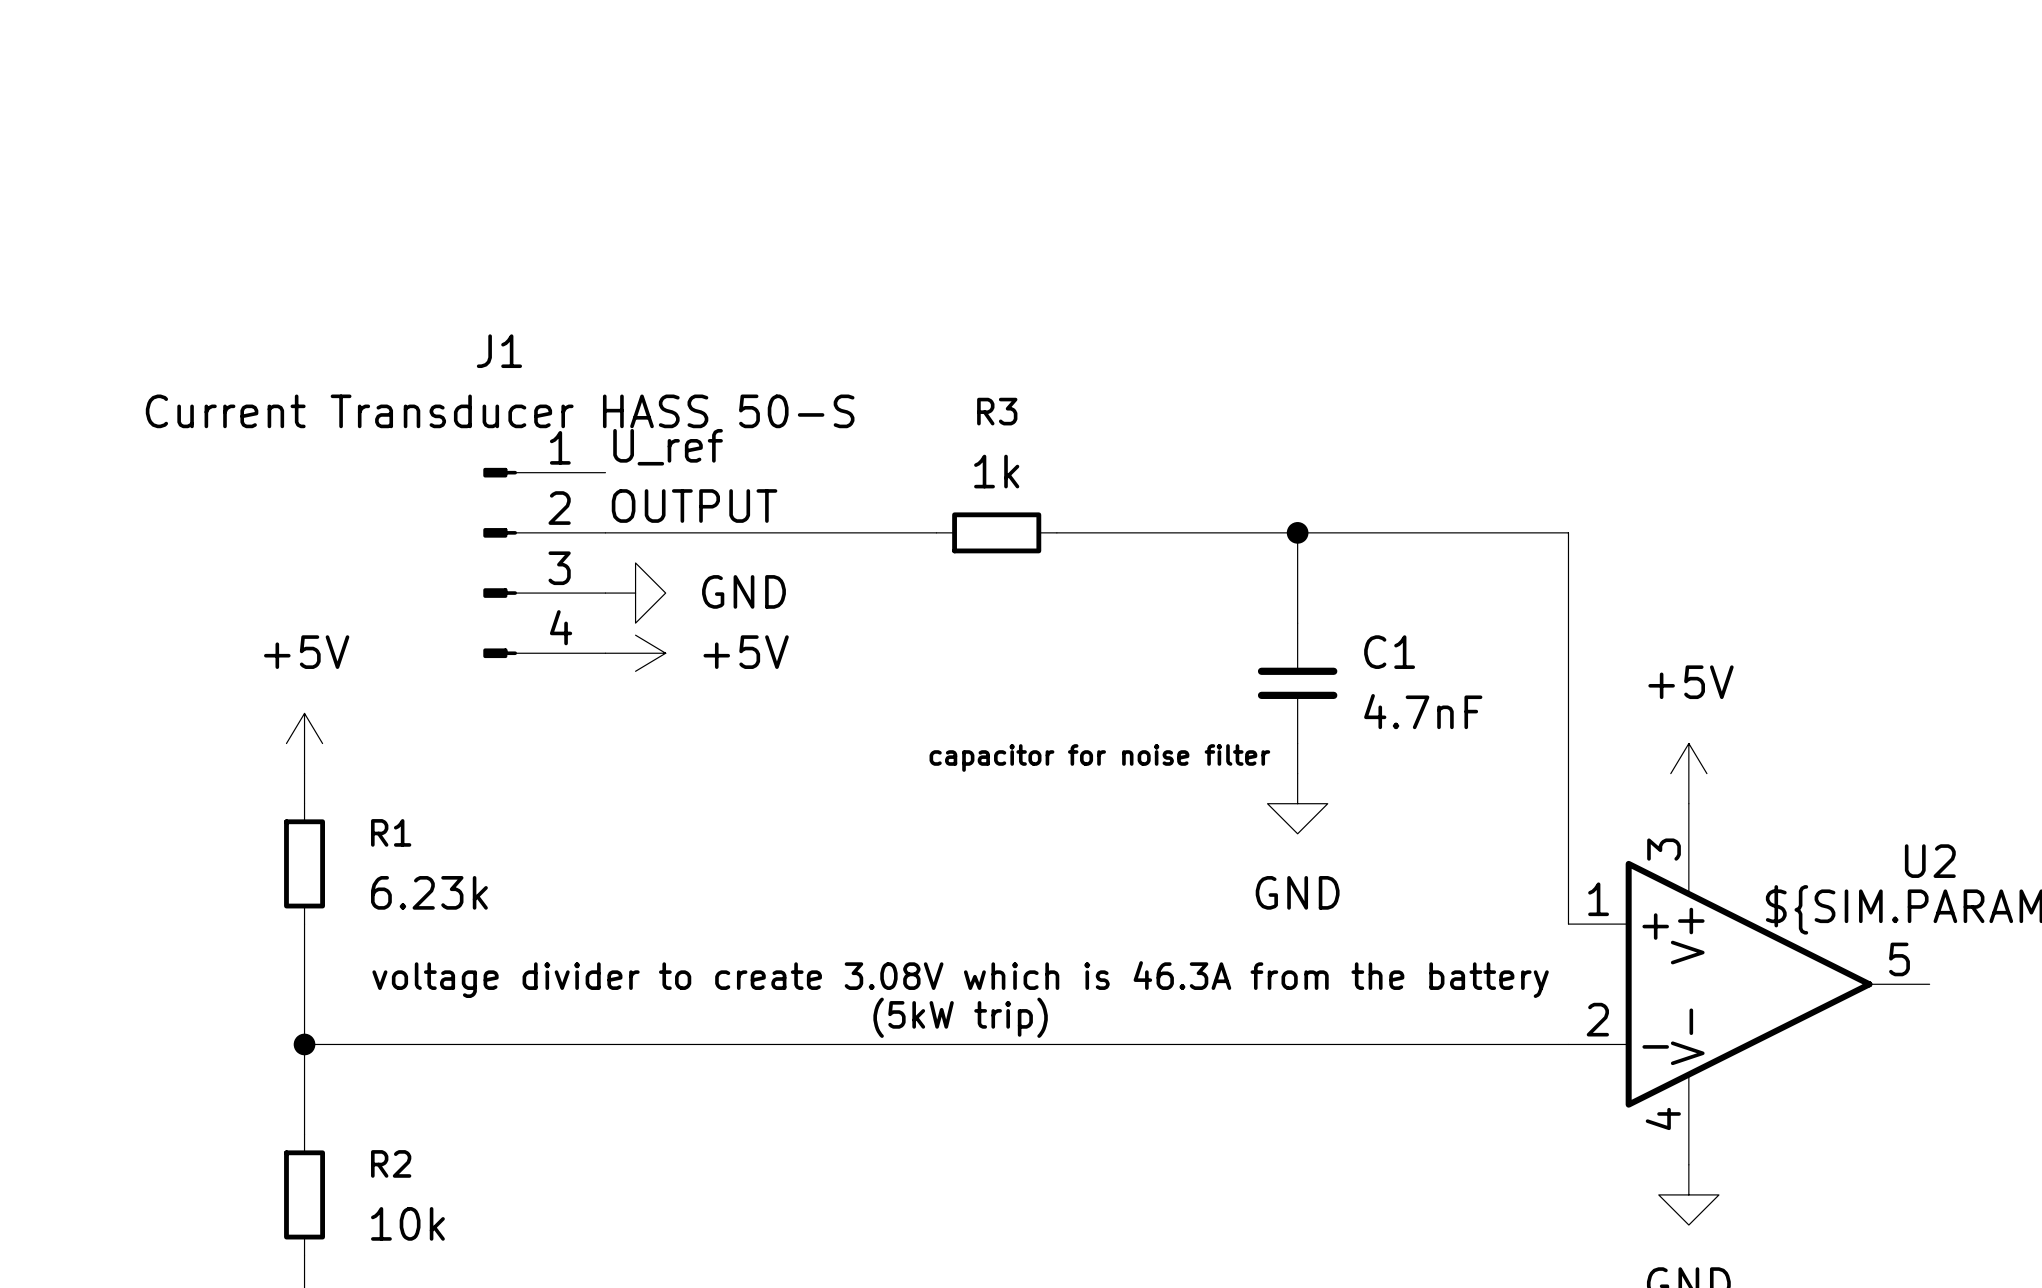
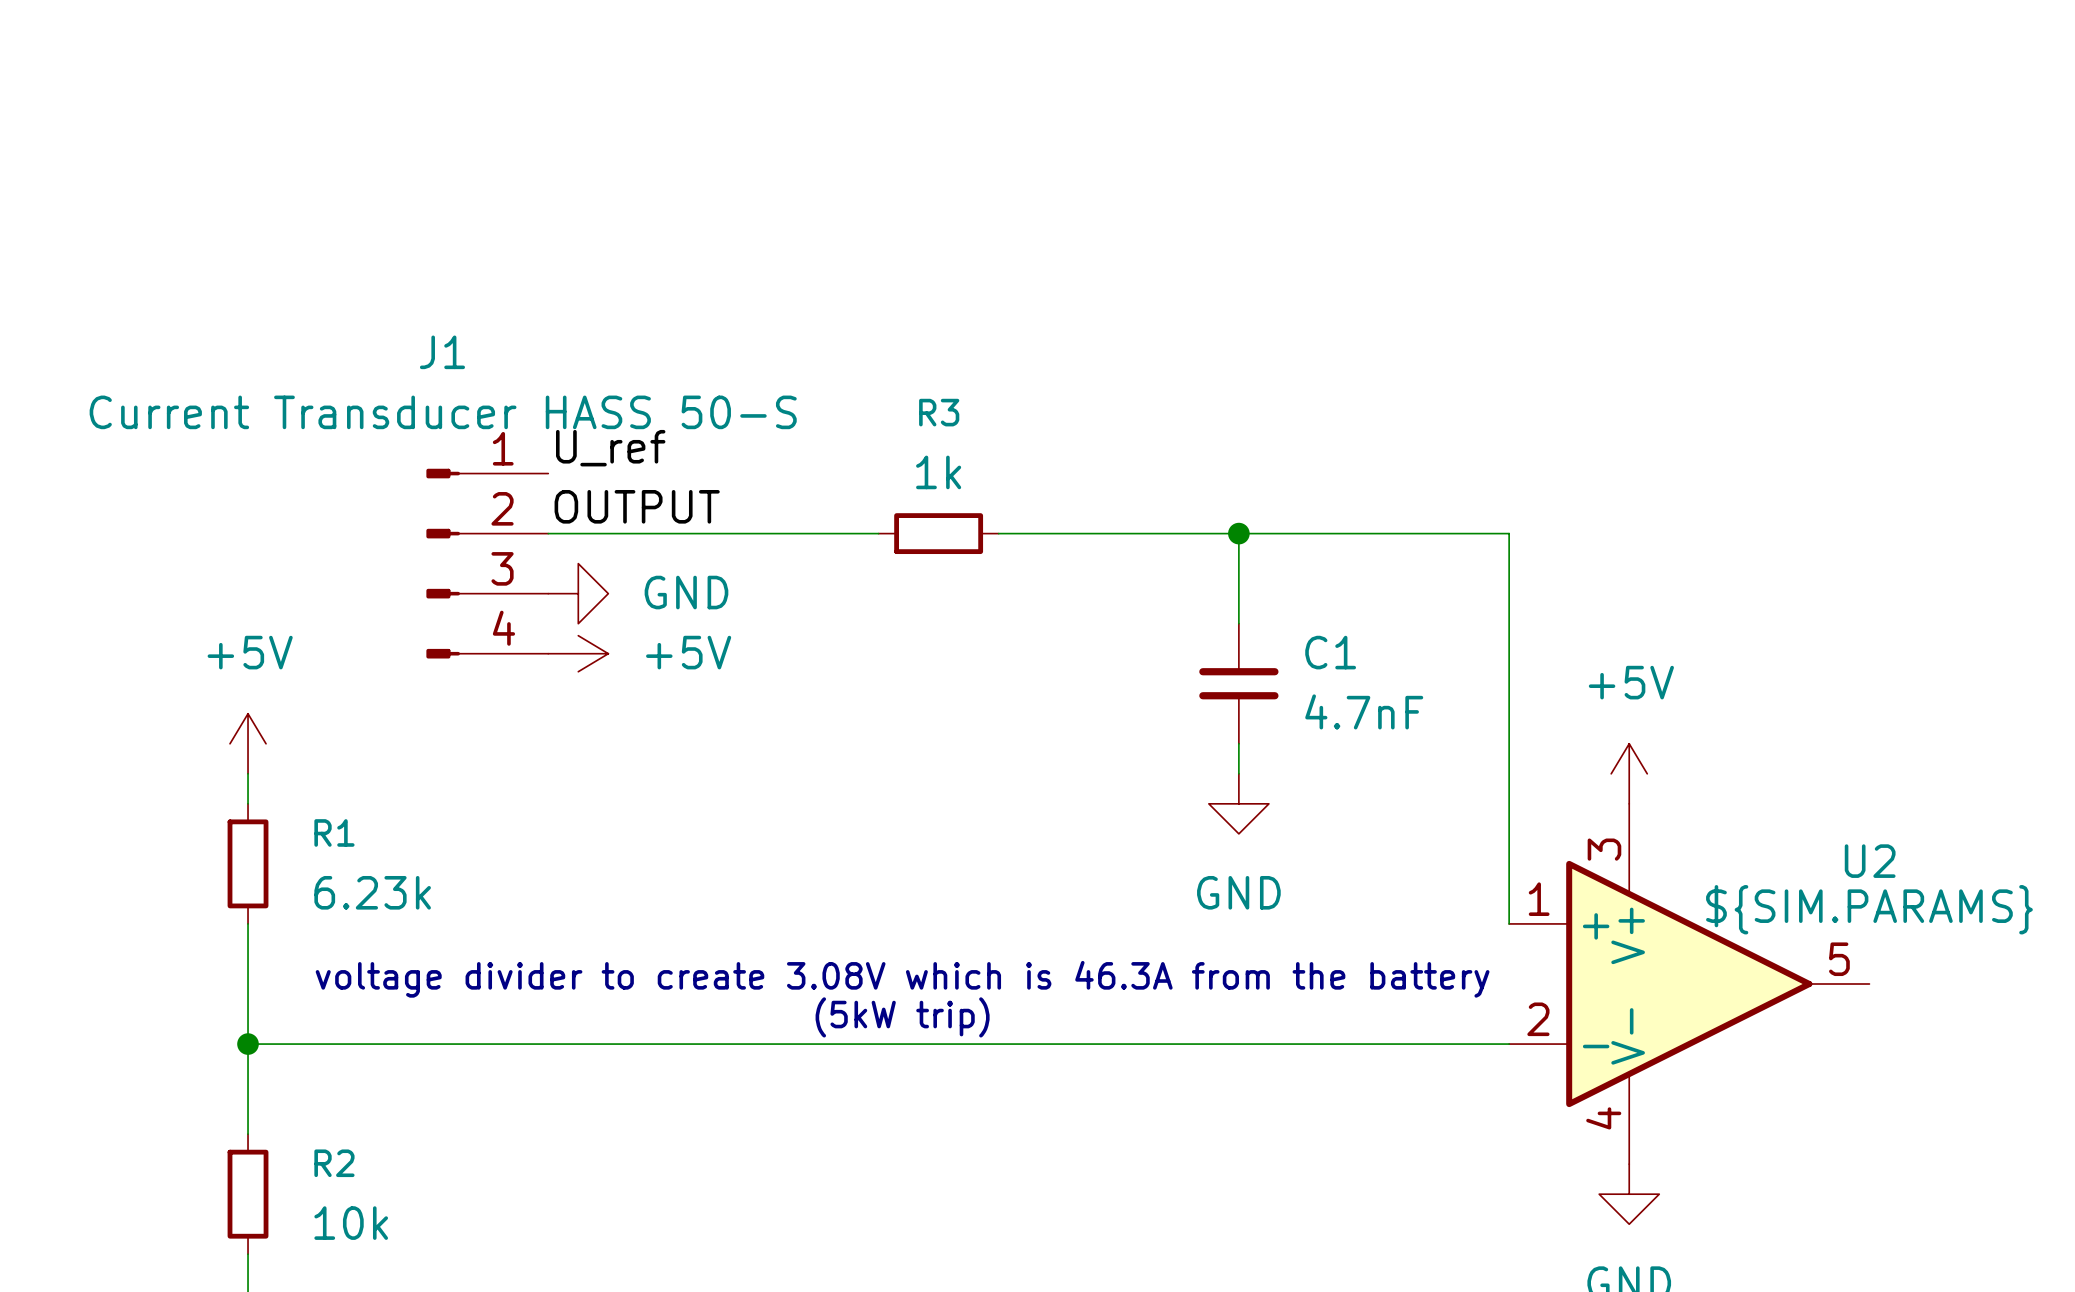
text: capacitor for noise filter (1099, 757) -> none

